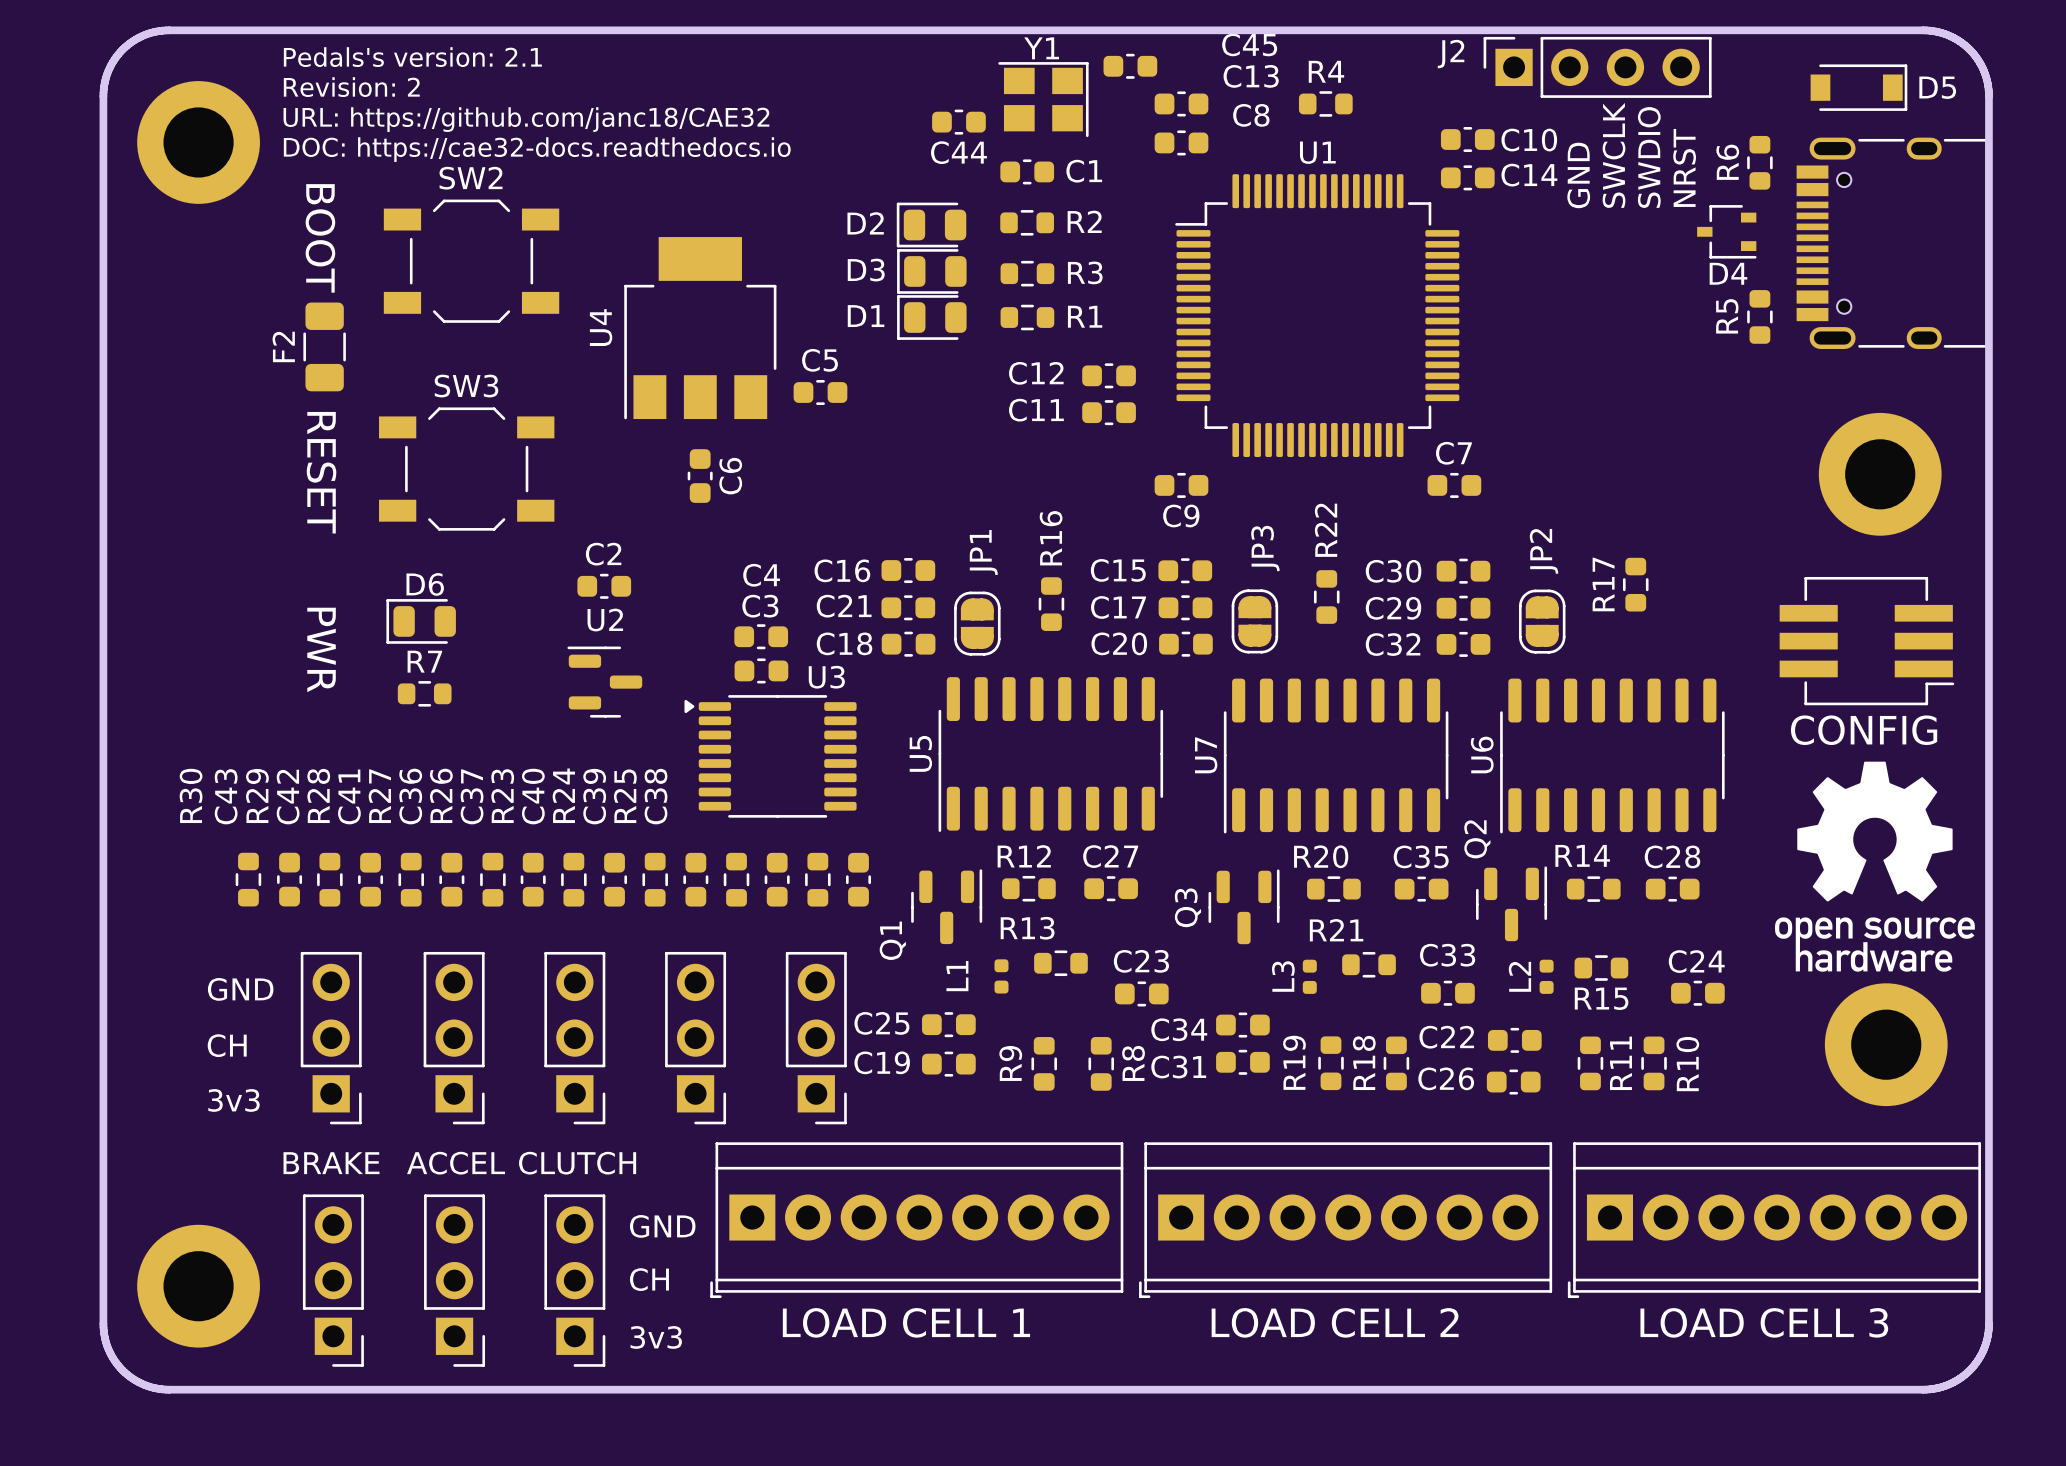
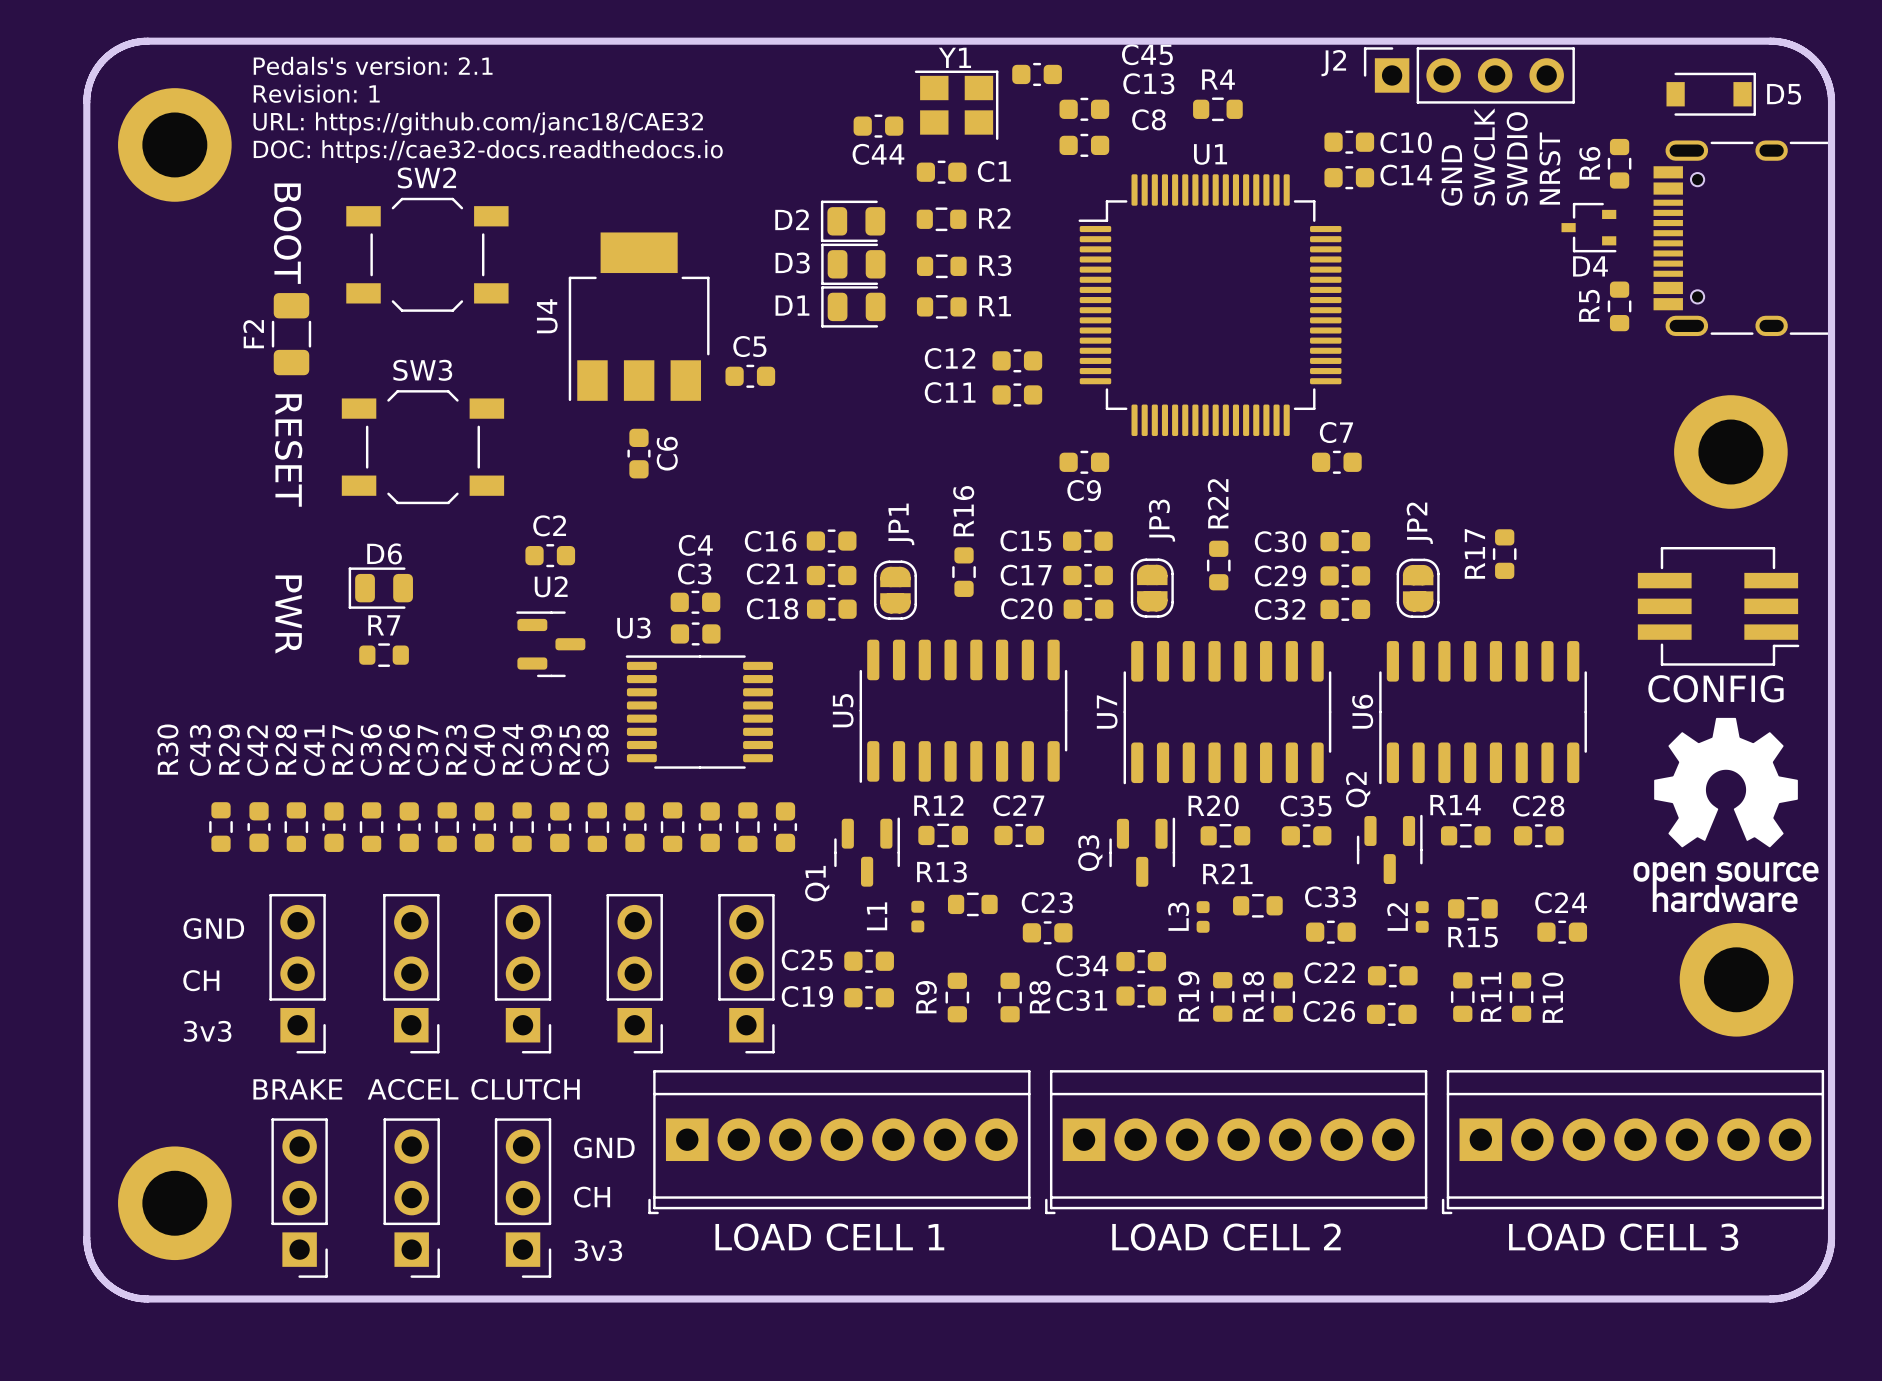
text: Revision: 2 (351, 87) -> Revision: 1 (316, 93)
U3 name position: U3 (826, 677) -> U3 (633, 628)
U3 footprint: [684, 695, 857, 818] -> [625, 655, 774, 769]

